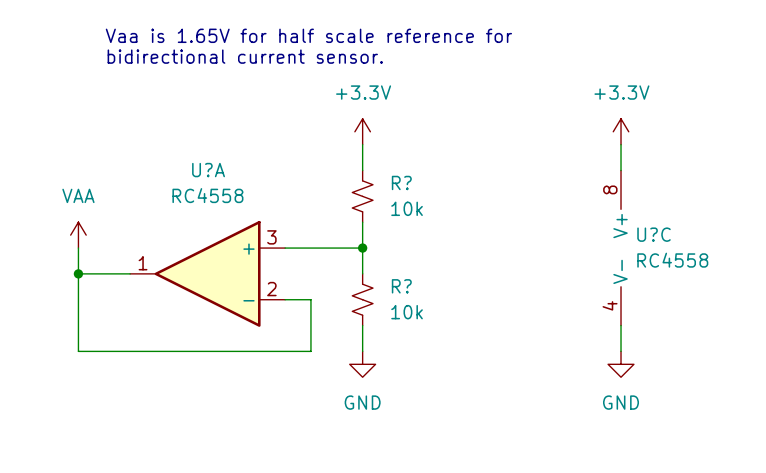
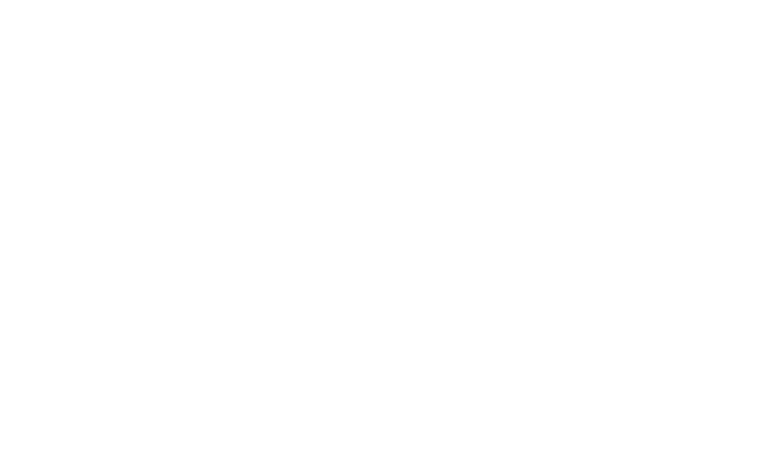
text: Vaa is 1.65V for half scale reference for (308, 35) -> none
text: bidirectional current sensor. (245, 56) -> none
power symbol: +3.3V (362, 131) -> none
power symbol: +3.3V (621, 131) -> none
wire: (362, 144) (362, 170) -> none
wire: (621, 144) (621, 170) -> none
R?: 10k (362, 196) -> none
wire: (362, 222) (362, 273) -> none
power symbol: VAA (78, 235) -> none
wire: (78, 248) (78, 351) (310, 351) (310, 299) (285, 299) -> none
wire: (285, 248) (362, 248) -> none
junction: (362, 248) -> none
U?C: RC4558 (621, 248) -> none
wire: (78, 273) (130, 273) -> none
junction: (78, 273) -> none
U?A: RC4558 (207, 273) -> none
R?: 10k (362, 299) -> none
wire: (362, 325) (362, 351) -> none
wire: (621, 325) (621, 351) -> none
power symbol: GND (362, 364) -> none
power symbol: GND (621, 364) -> none

